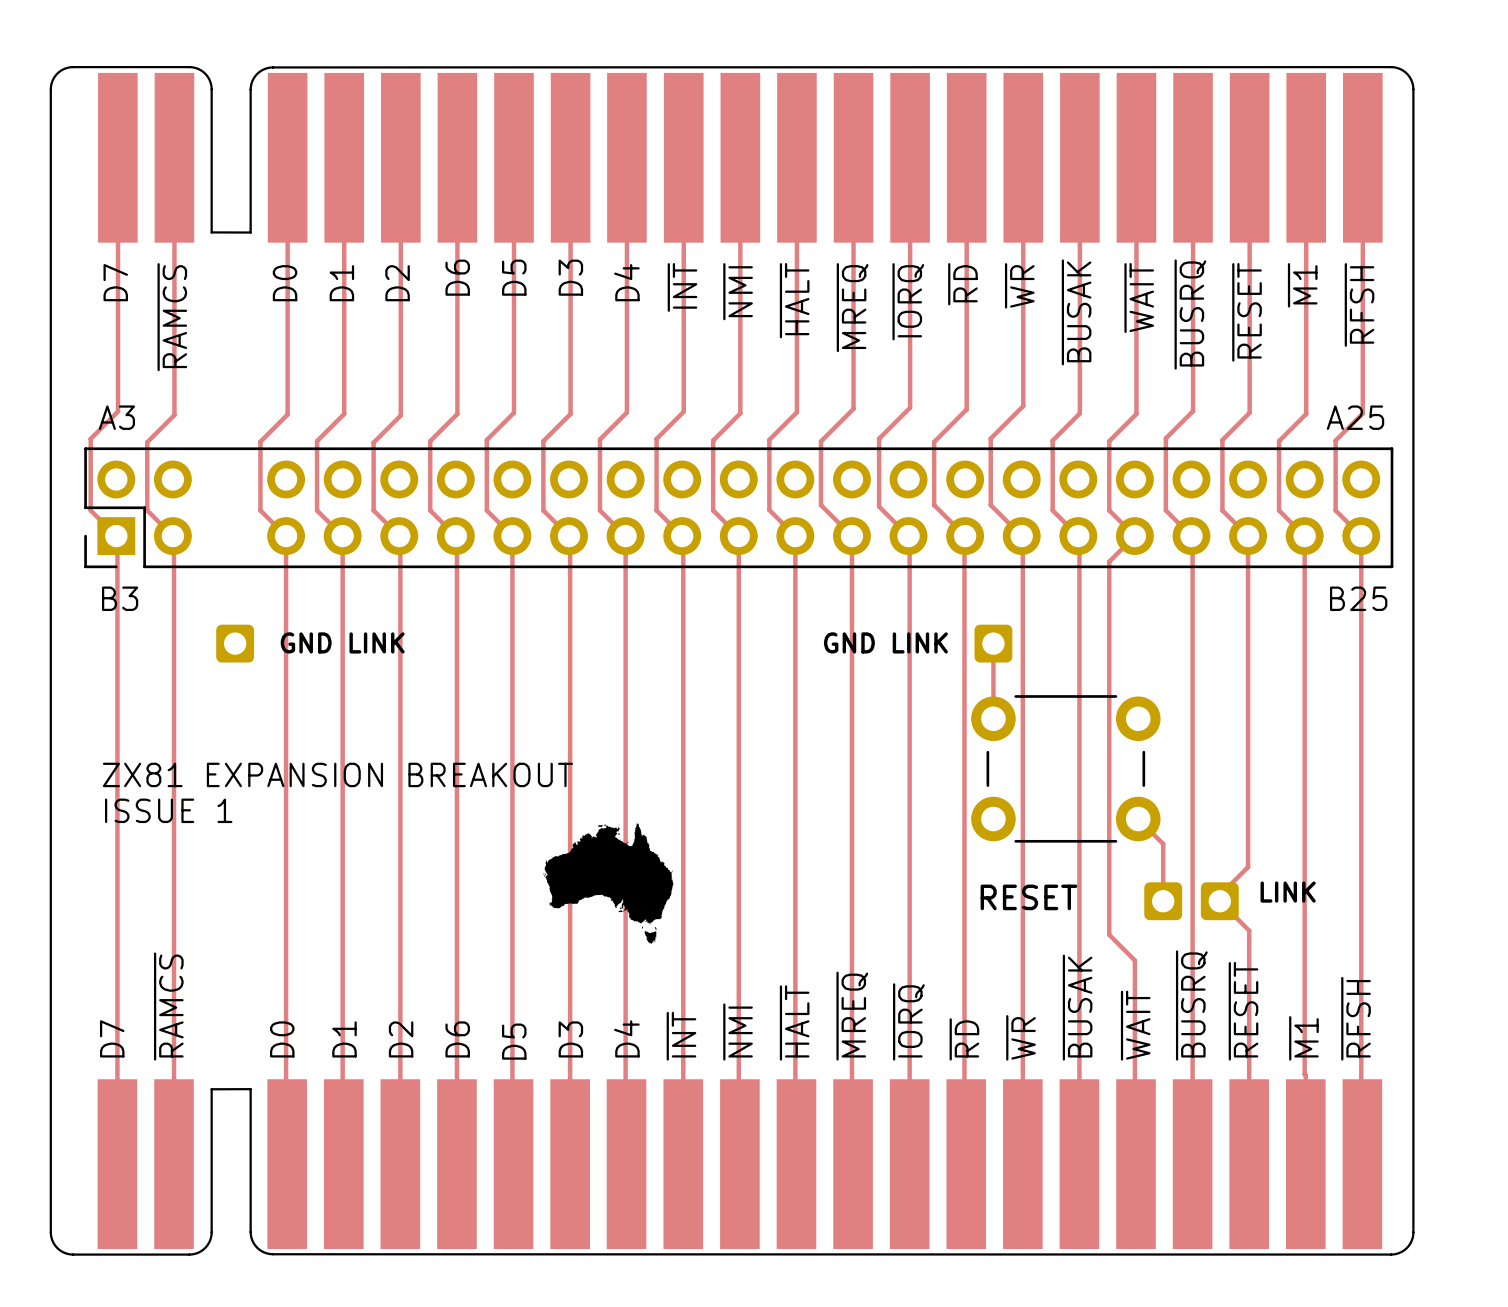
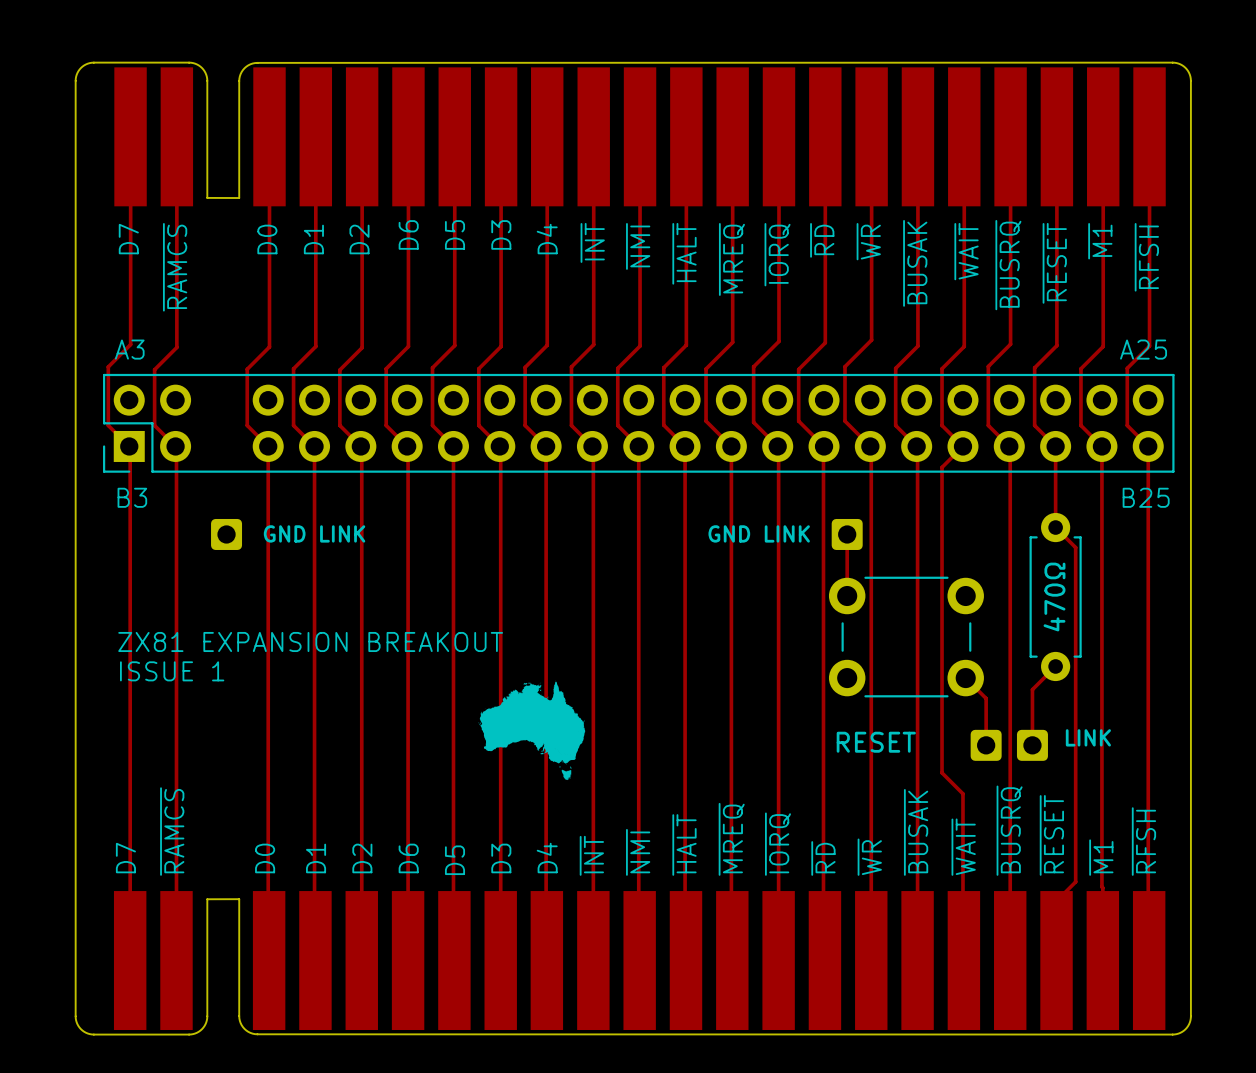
track: (1248, 635) (1248, 867) (1219, 895) -> (1055, 666) (1032, 689) (1032, 740)
part: none -> 470Ω (1055, 597)
track: (1219, 901) (1249, 930) (1249, 1091) -> (1055, 527) (1075, 547) (1075, 881) (1056, 901)

